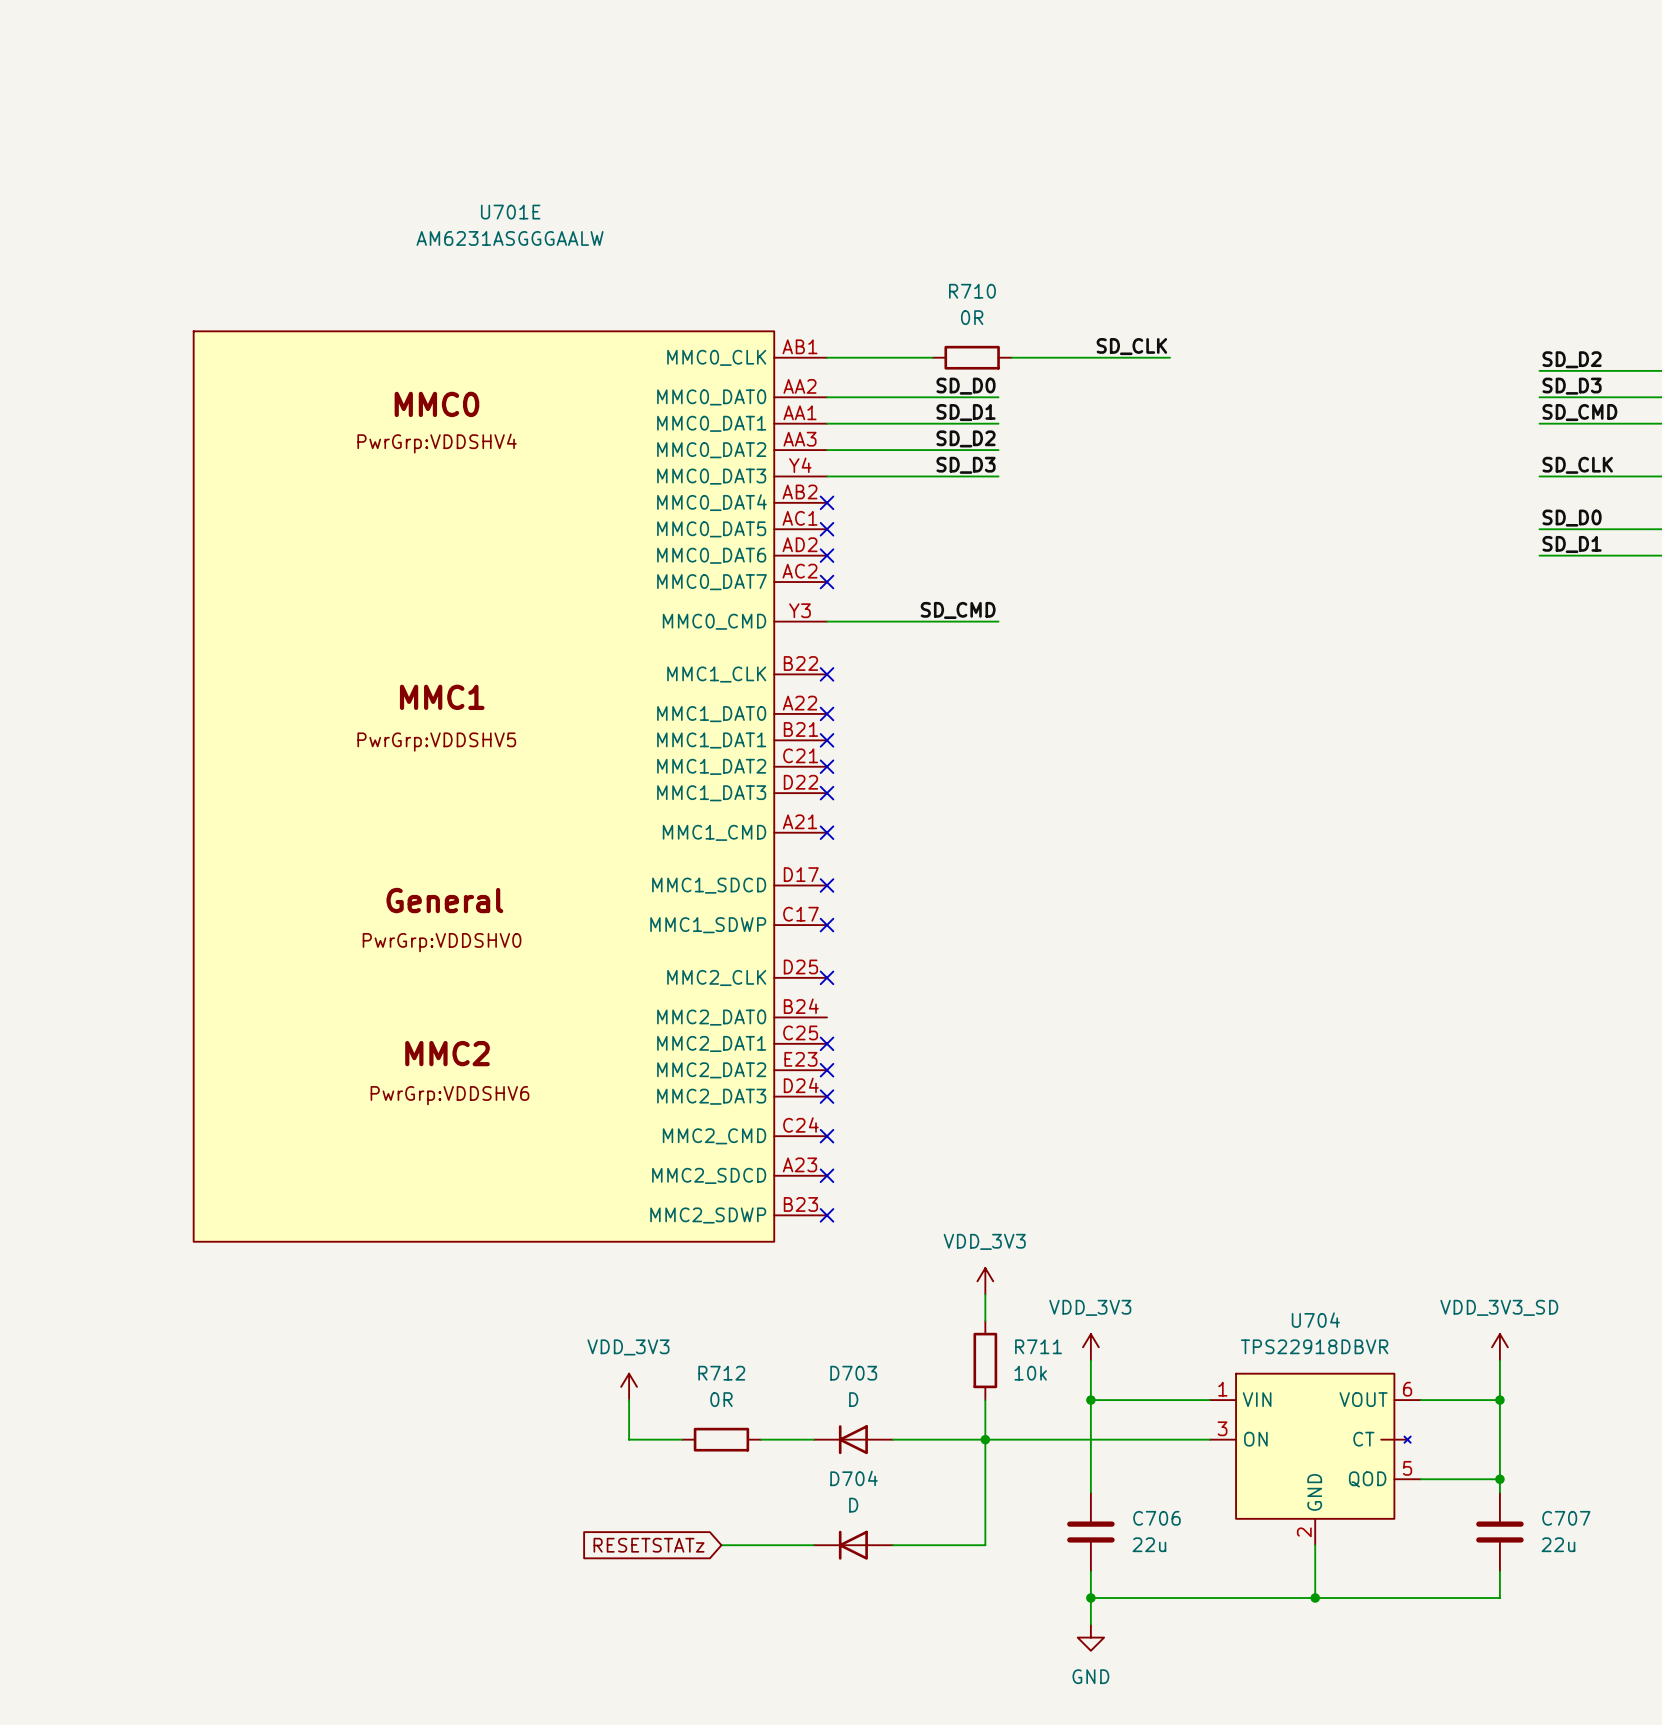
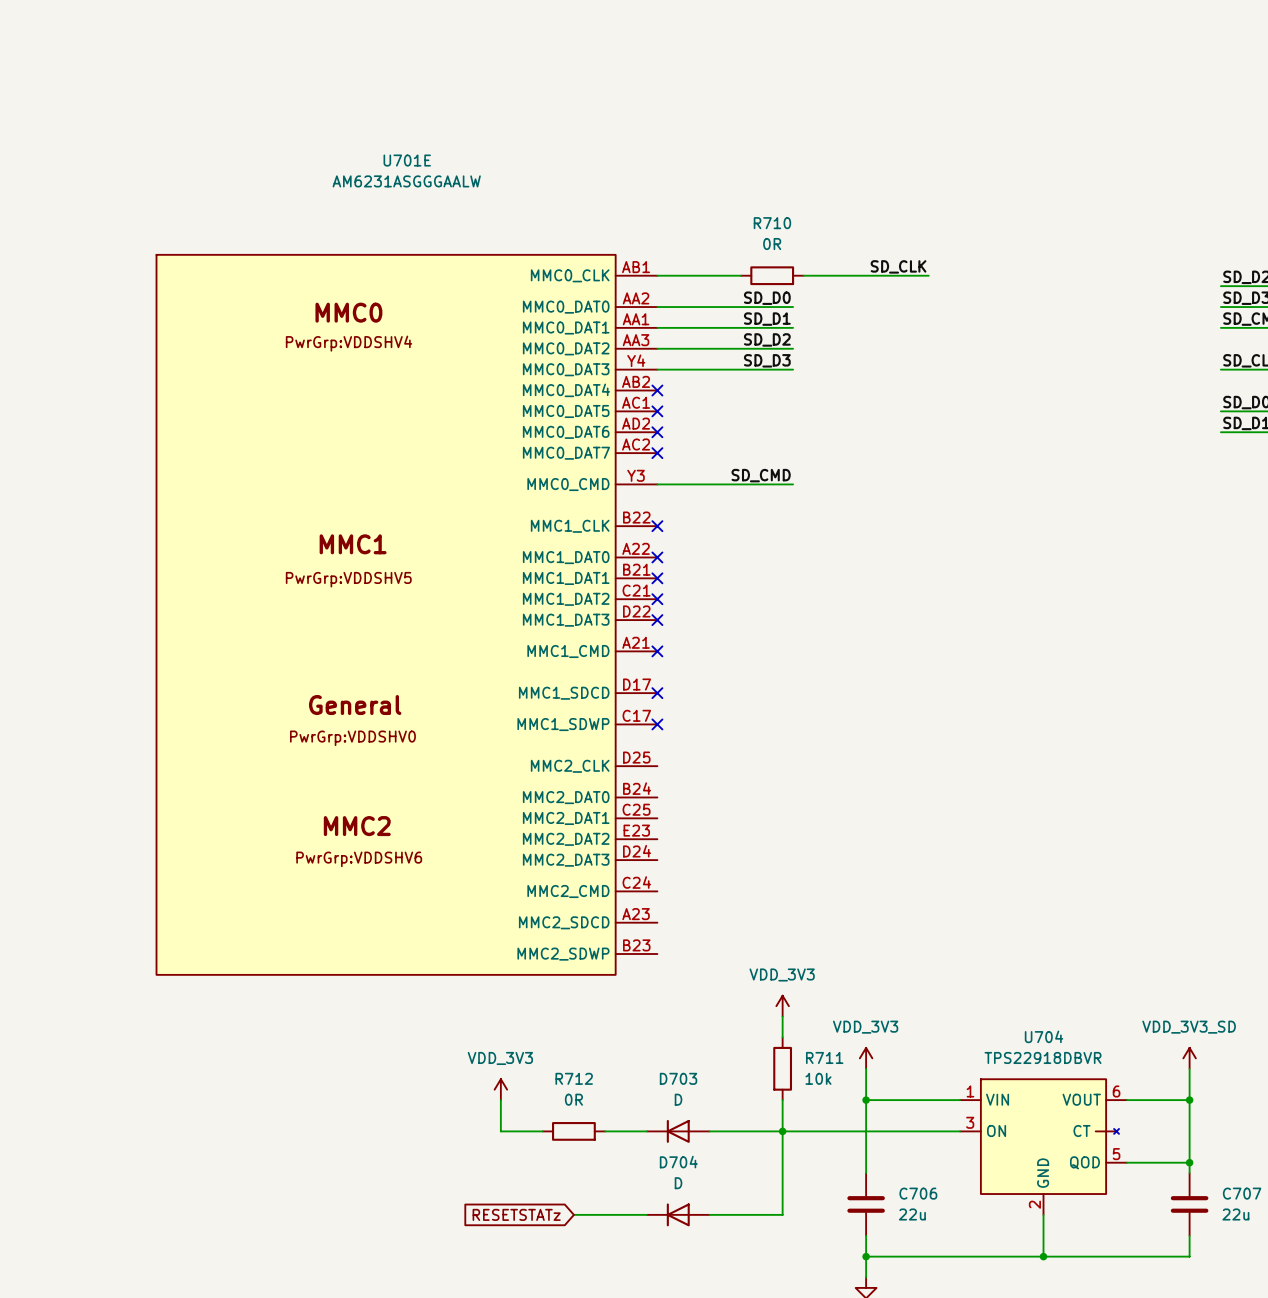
no-connect mark: (827, 977) -> none
no-connect mark: (827, 1043) -> none
no-connect mark: (827, 1070) -> none
no-connect mark: (827, 1096) -> none
no-connect mark: (827, 1136) -> none
no-connect mark: (827, 1175) -> none
no-connect mark: (827, 1215) -> none

